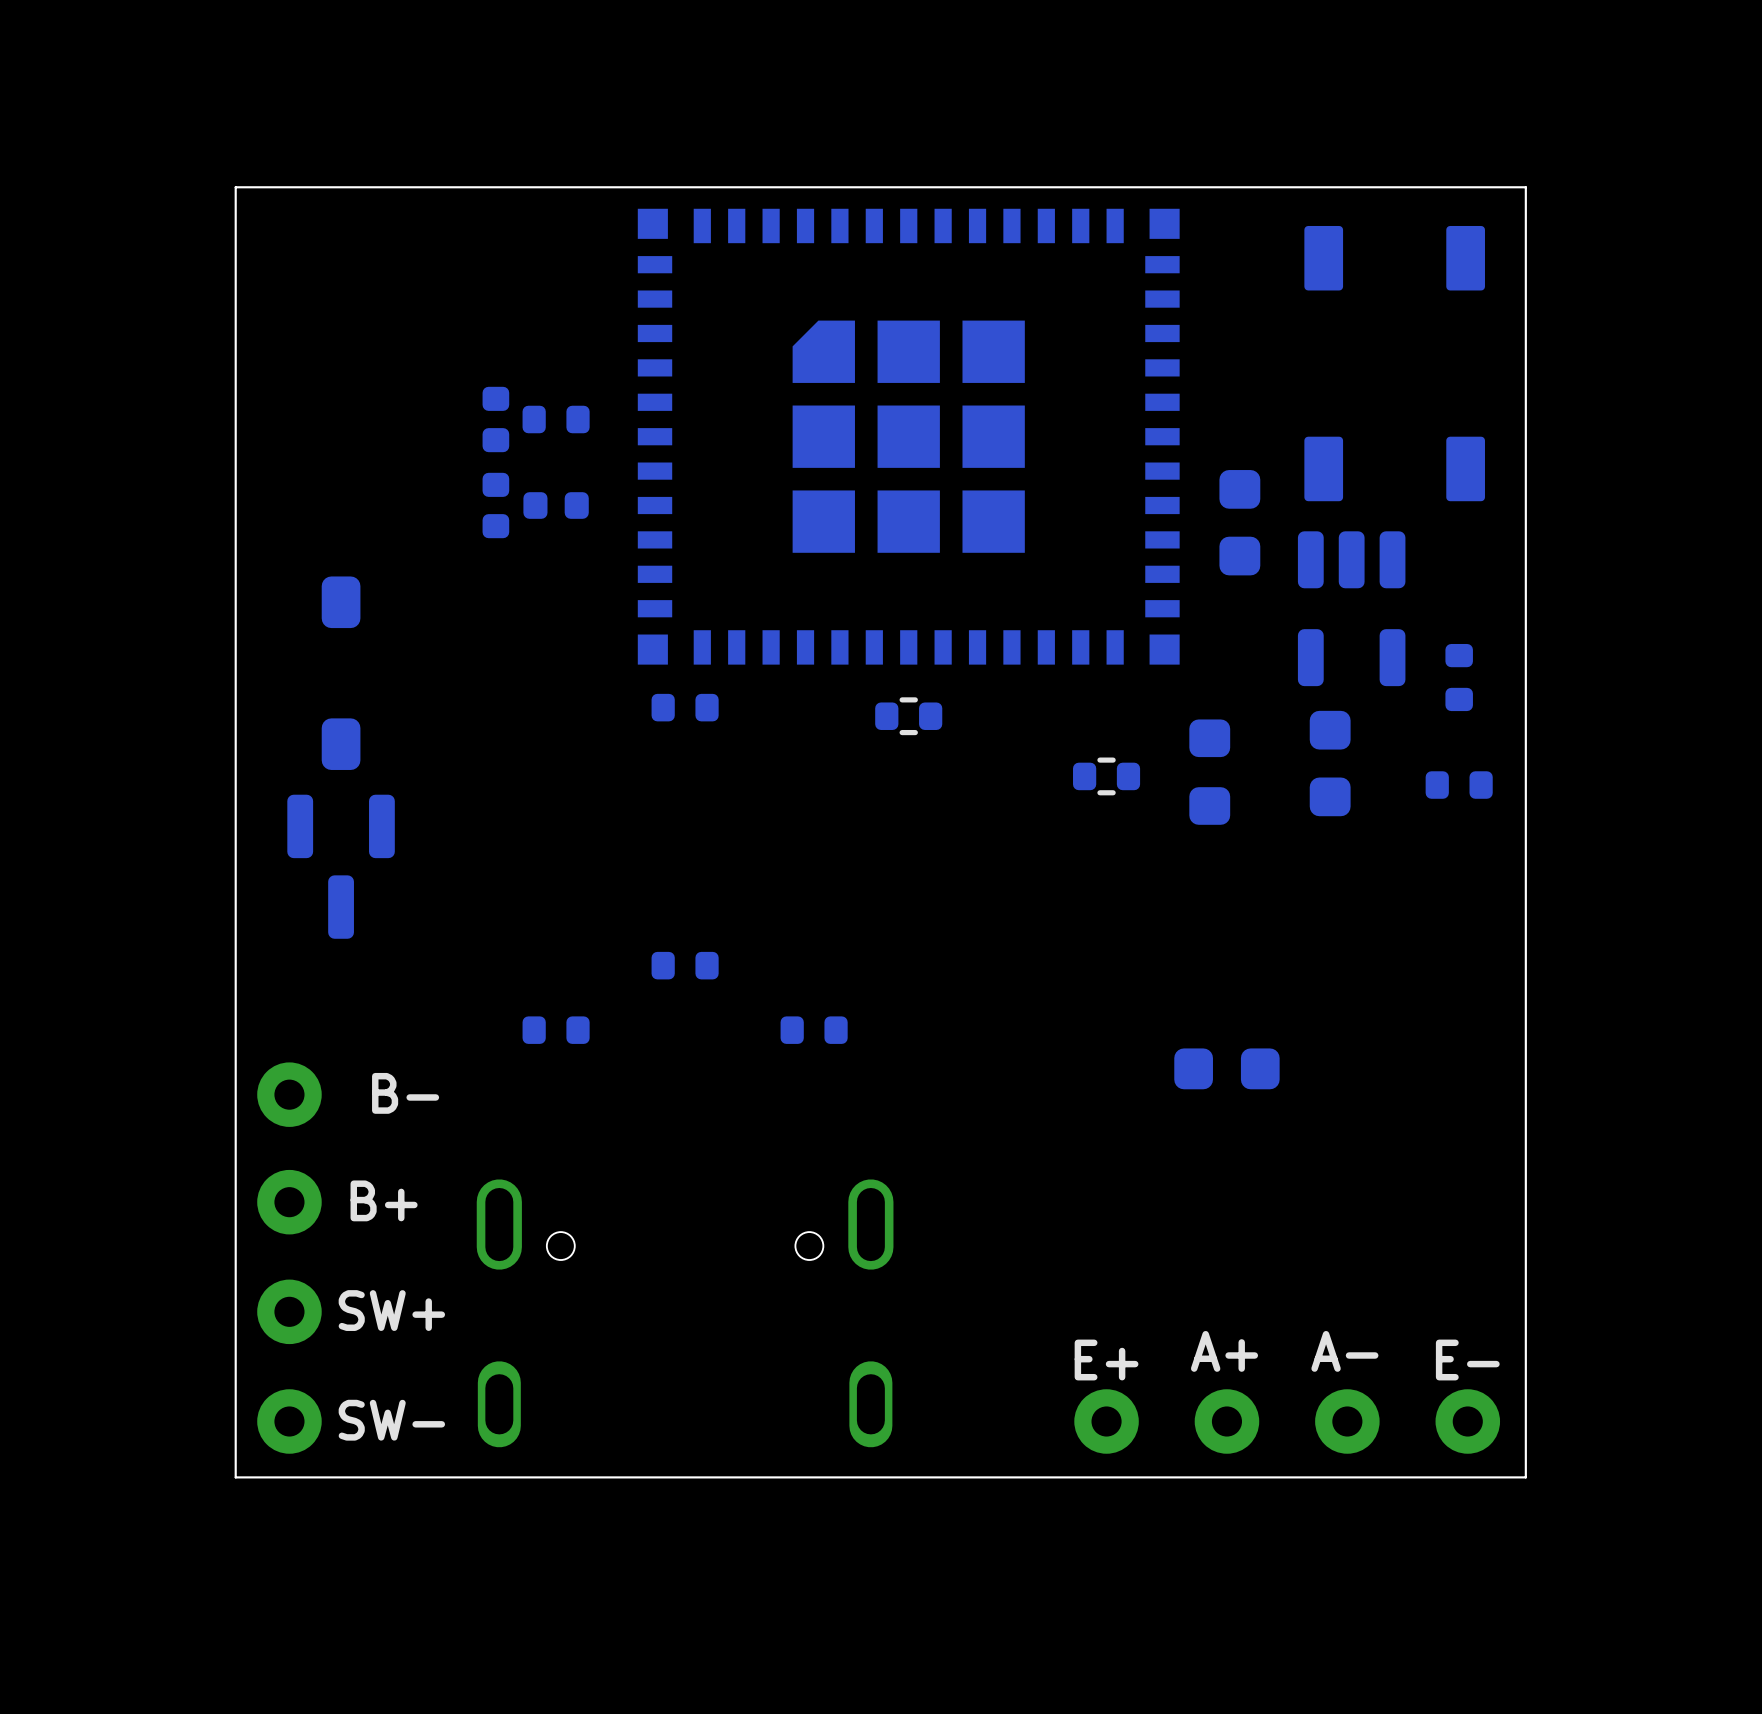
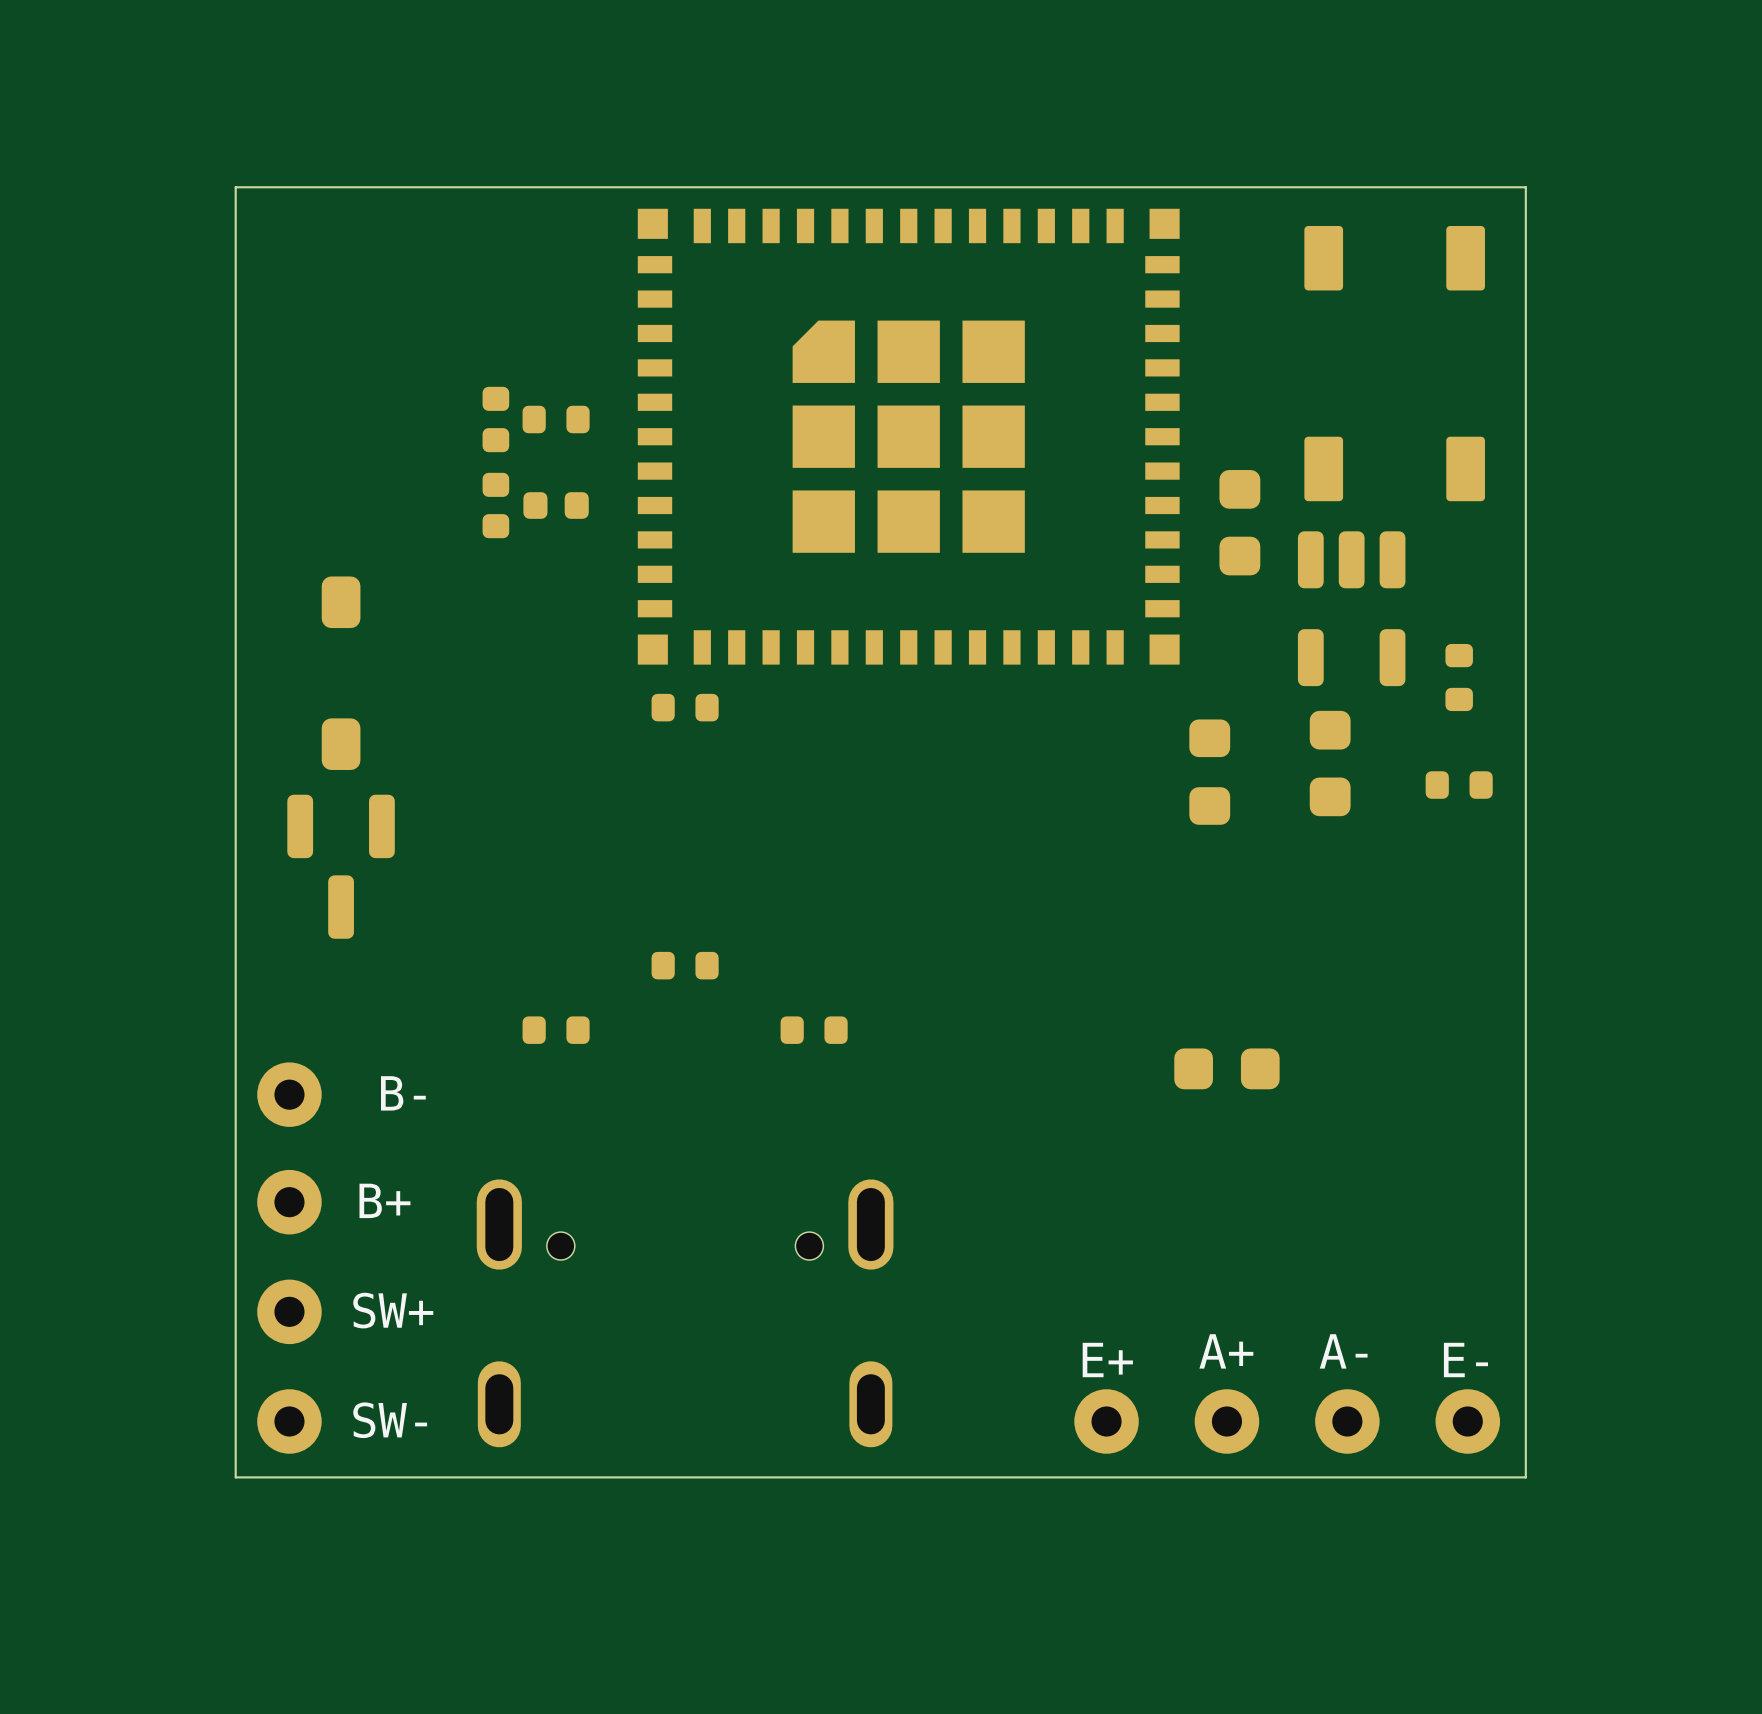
part: (908, 716) -> none
part: (1106, 776) -> none

